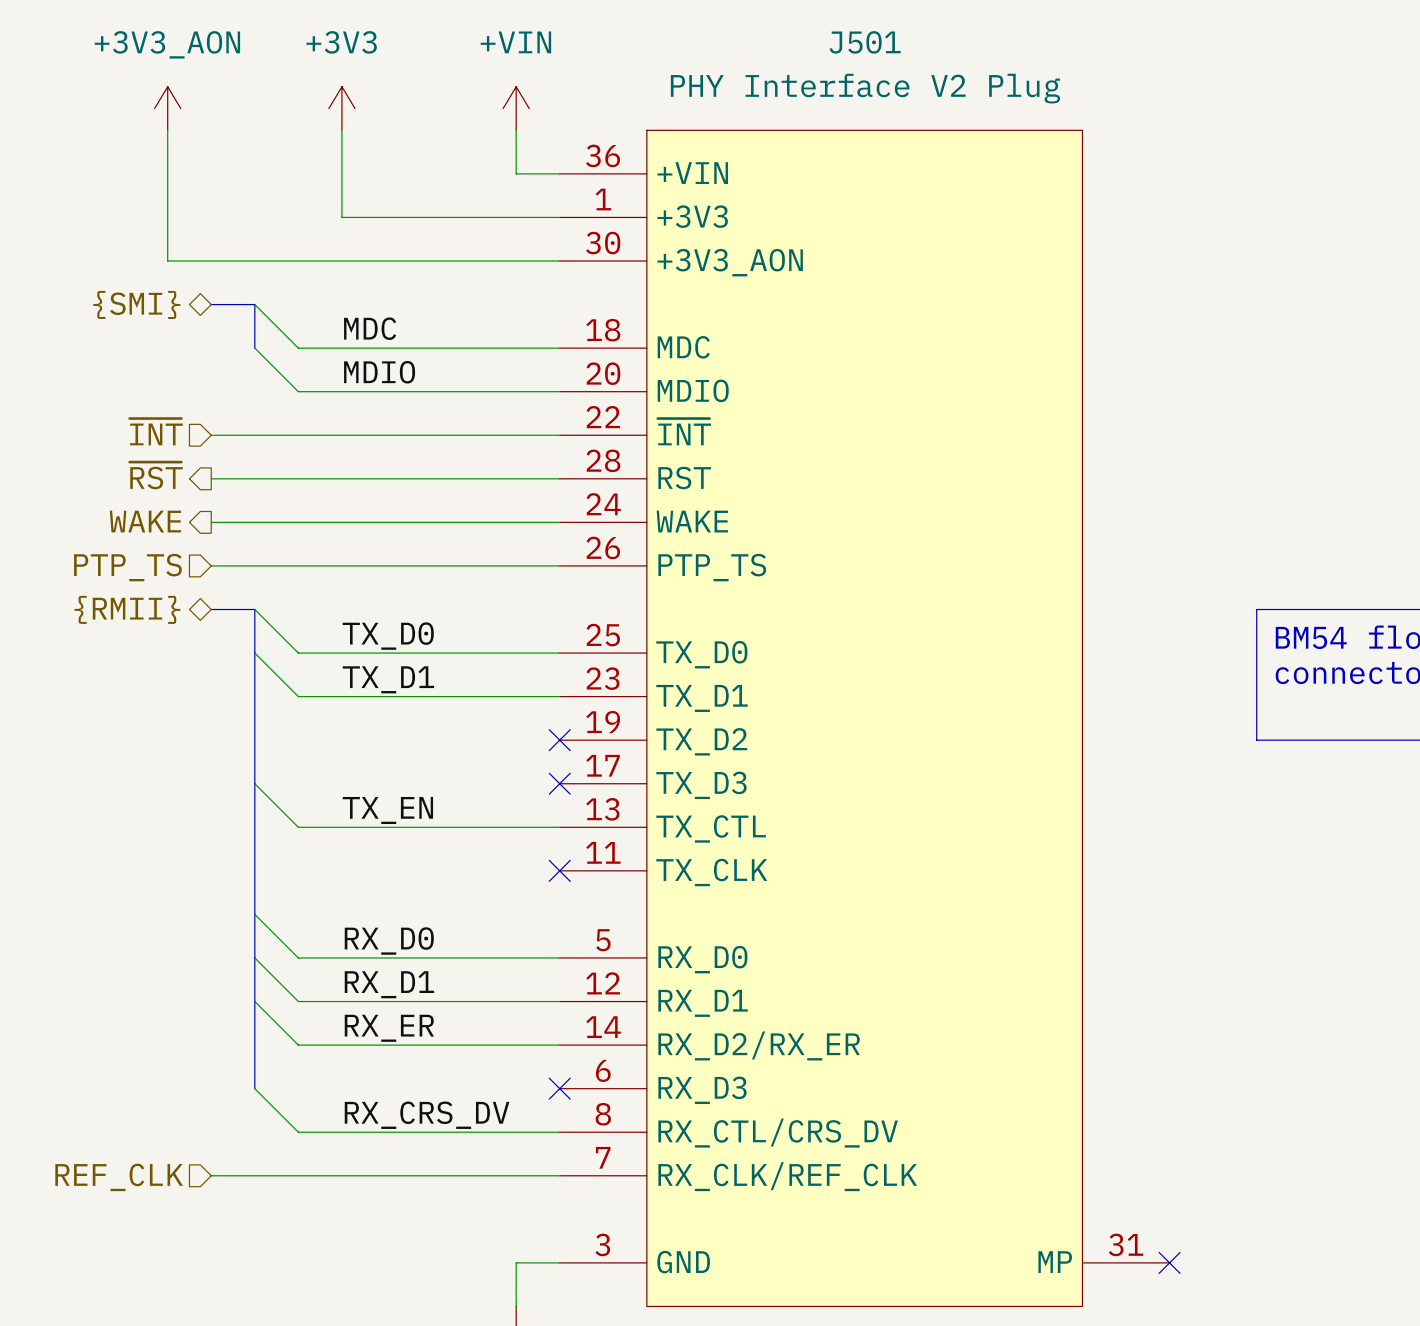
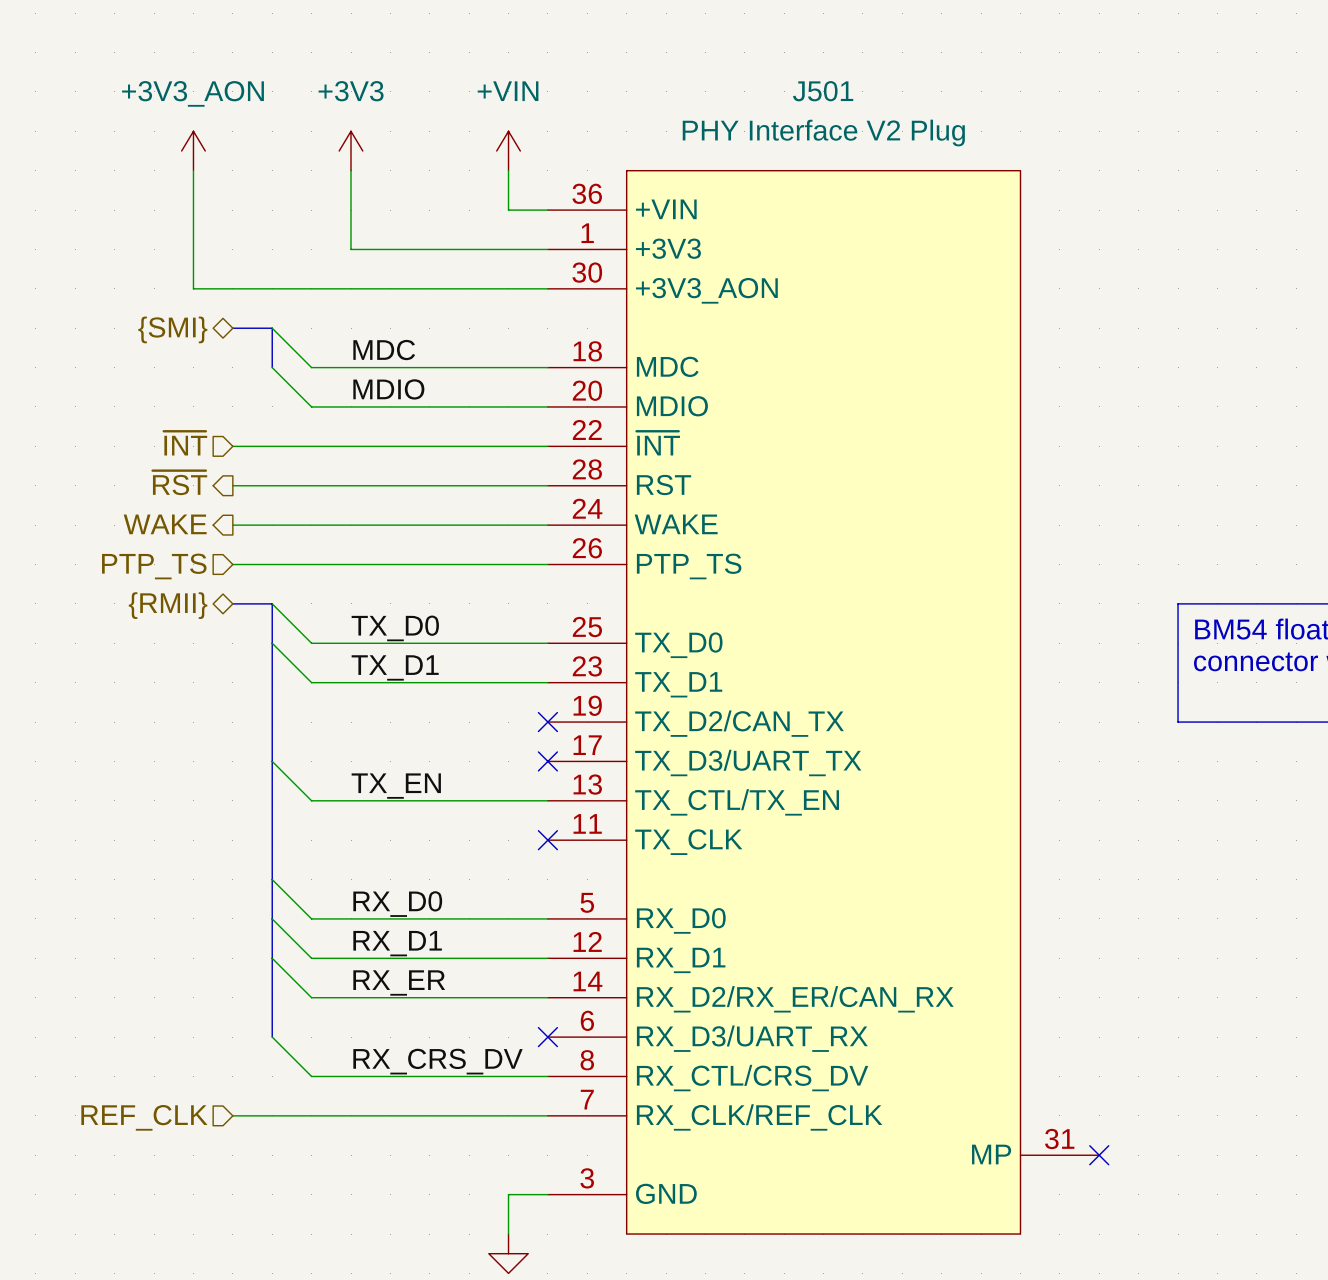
J501 symbol: [559, 130, 1170, 1307] -> [547, 170, 1100, 1235]
no-connect mark position: (1169, 1262) -> (1099, 1155)

